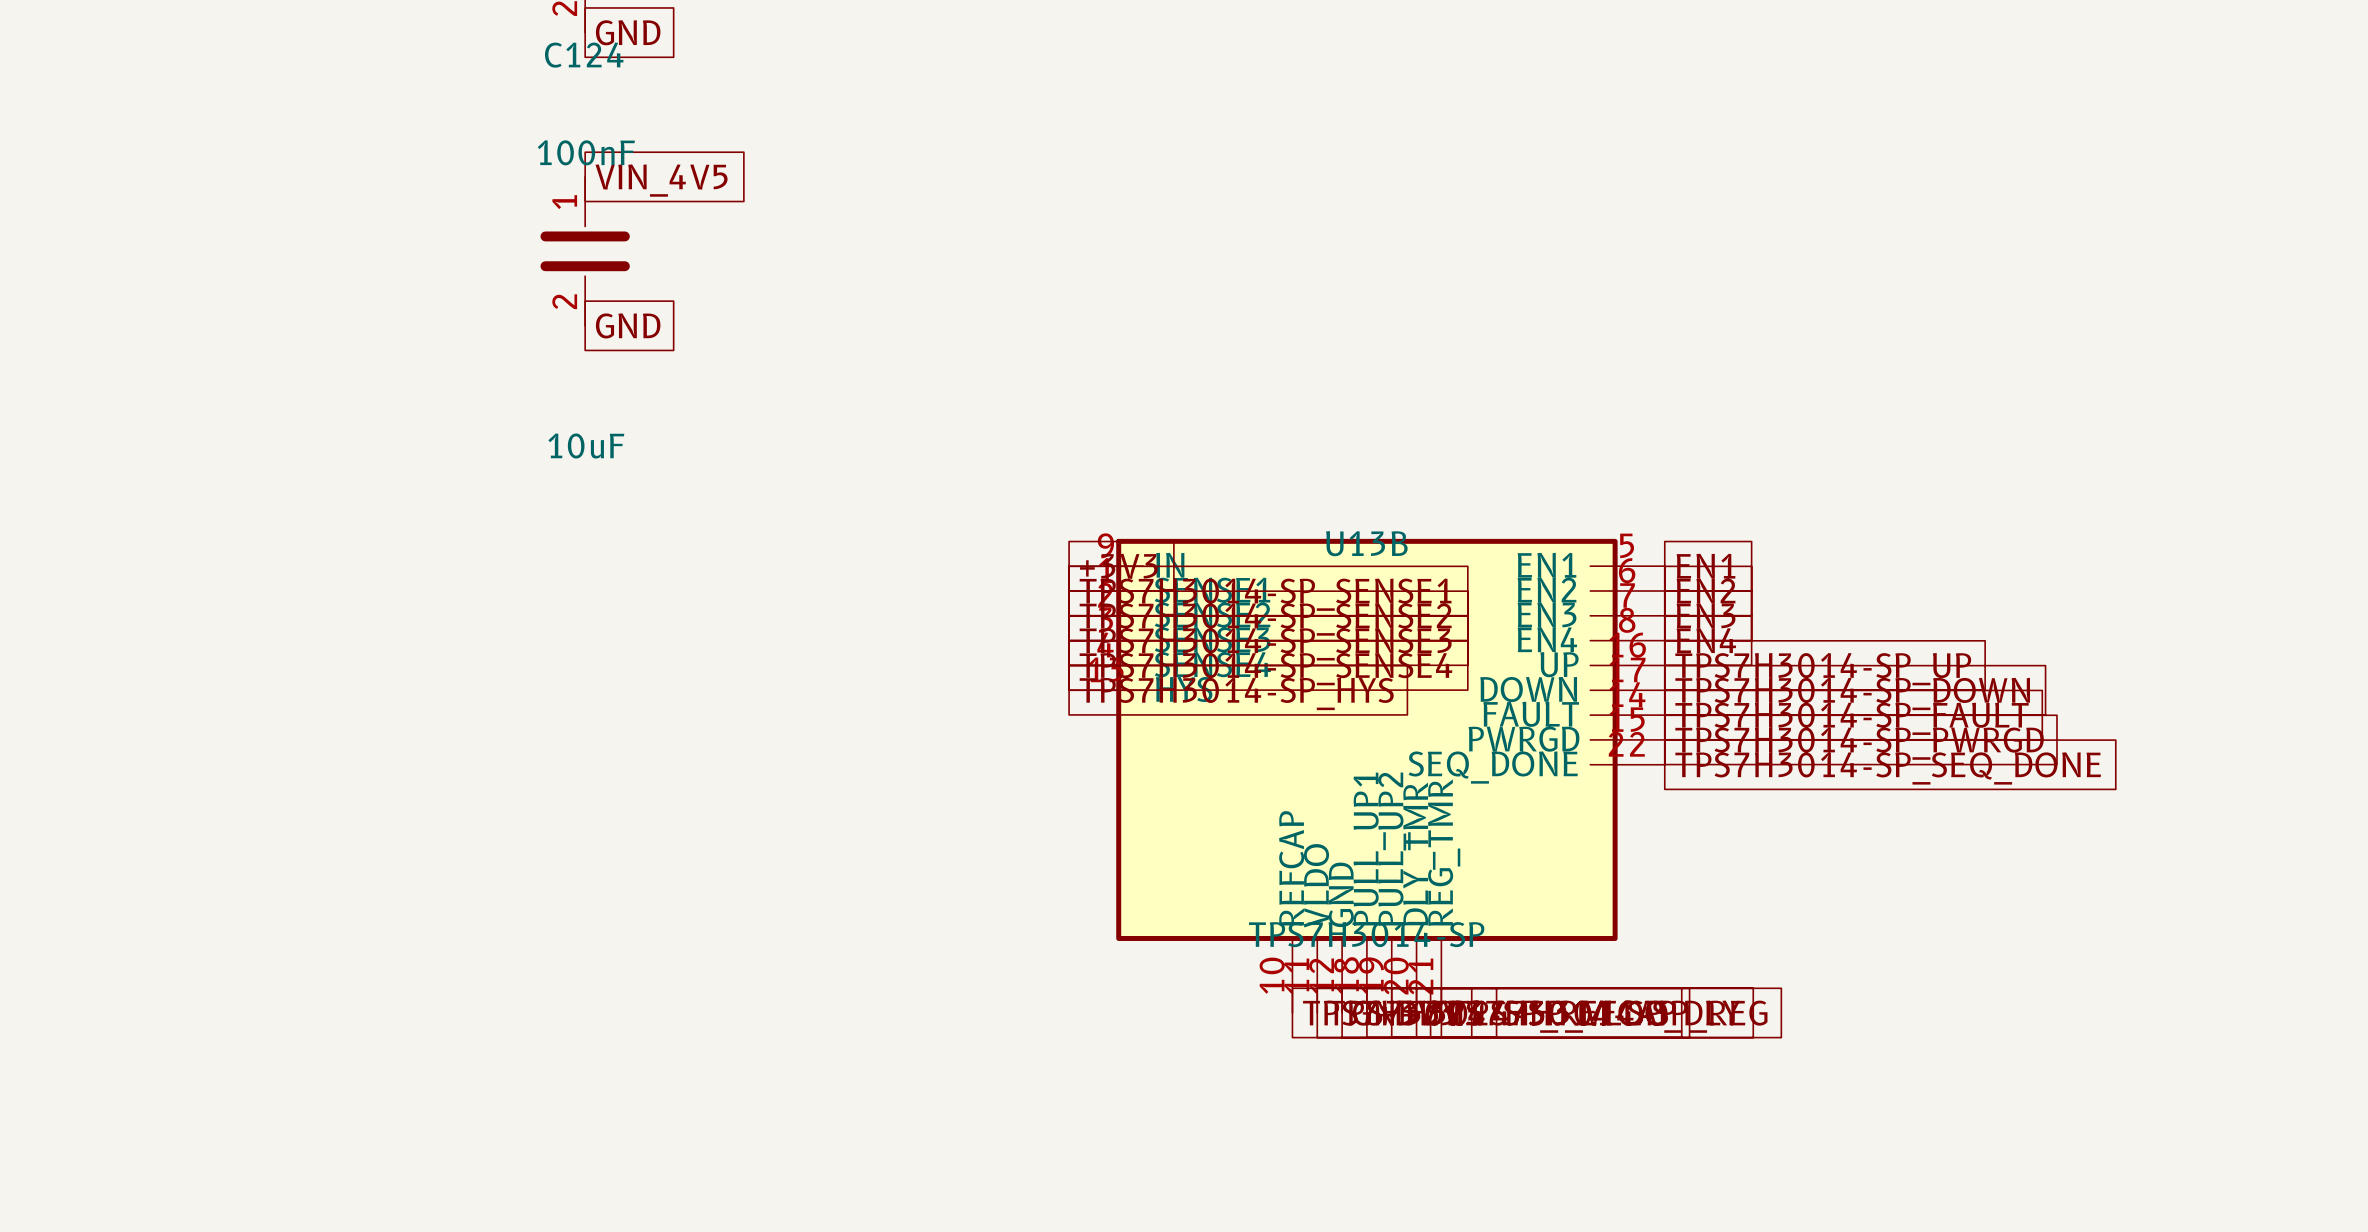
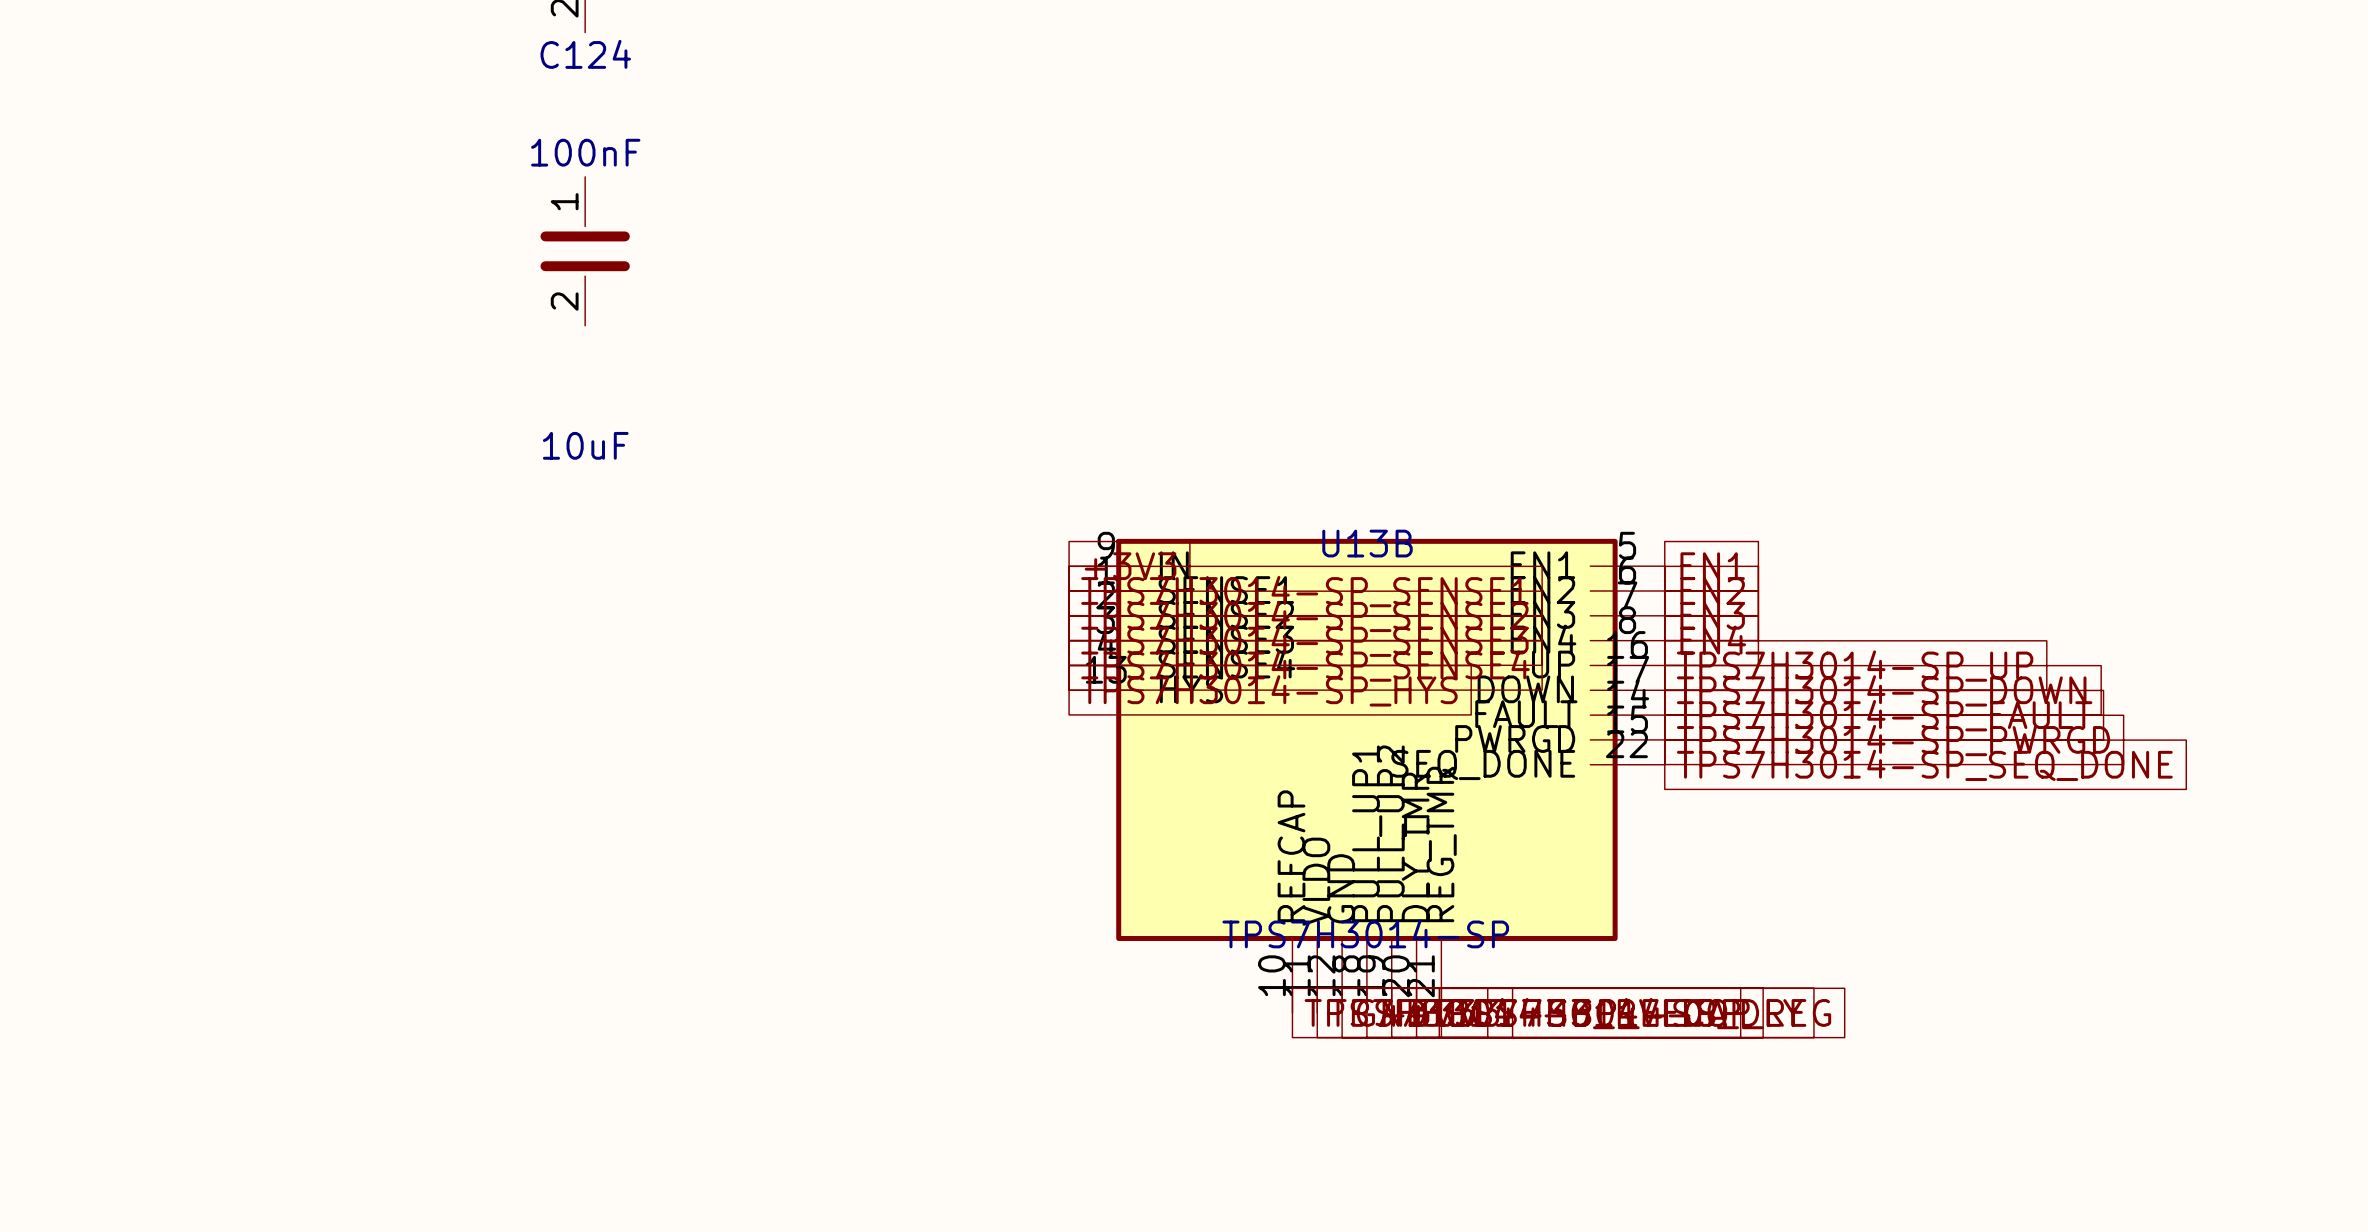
global label: GND (628, 32) -> none
global label: VIN_4V5 (661, 180) -> none
global label: GND (628, 325) -> none

